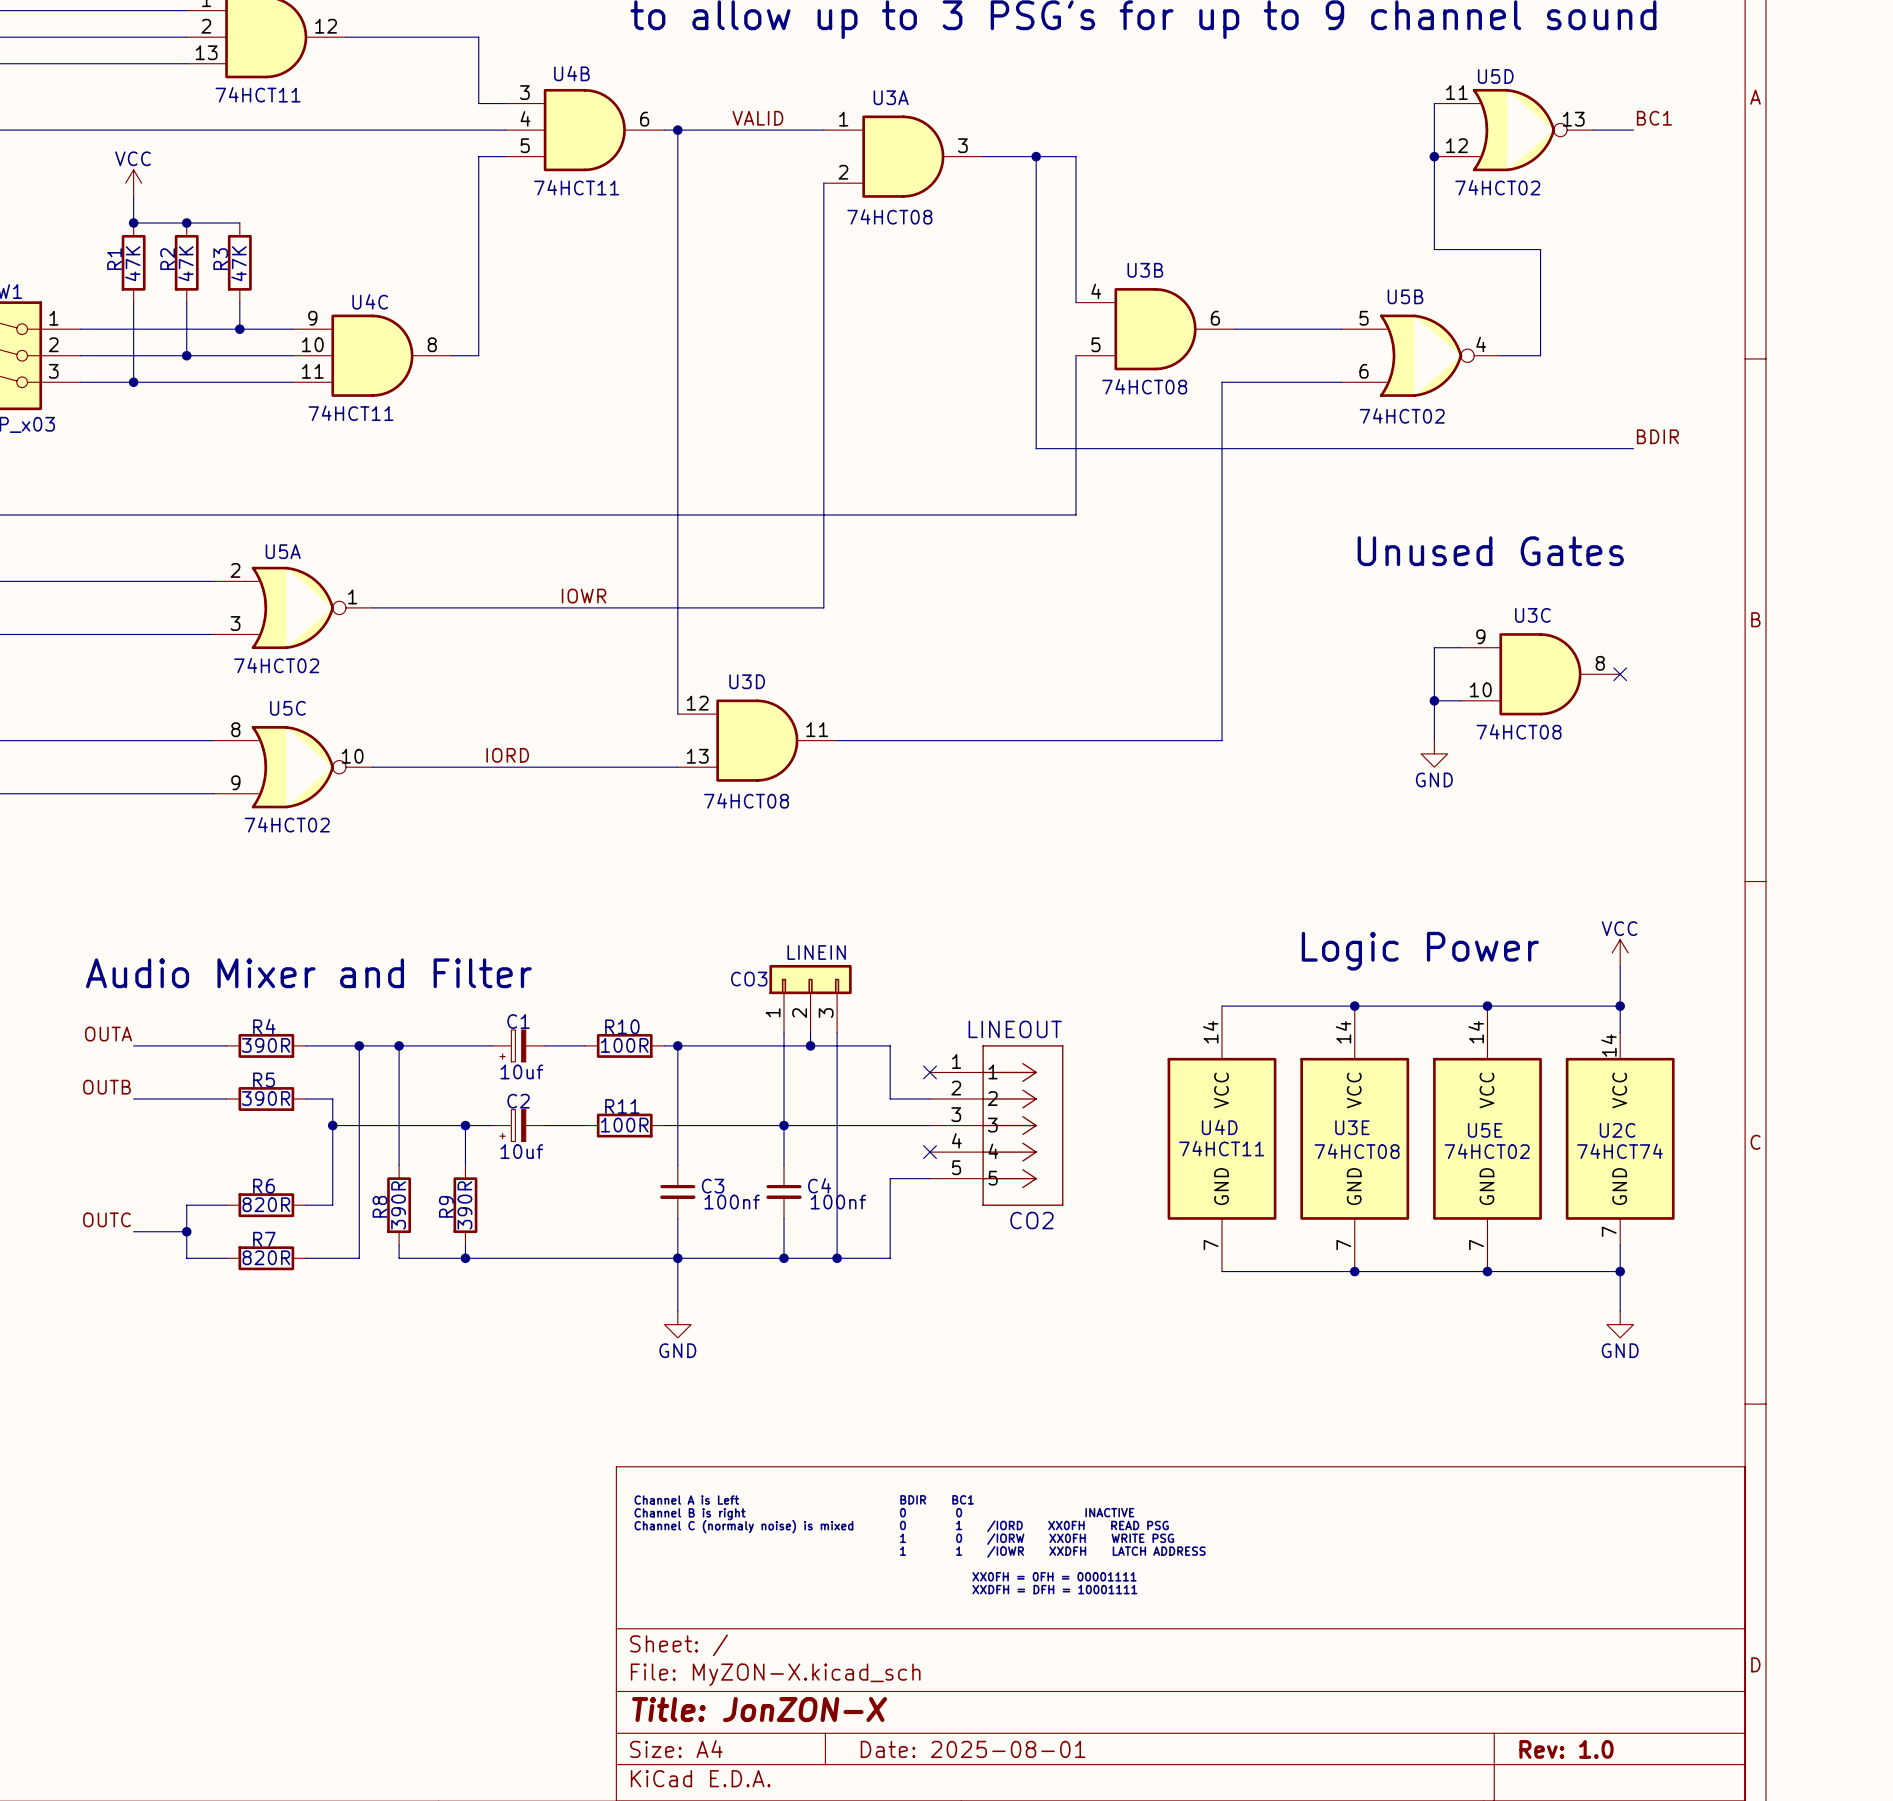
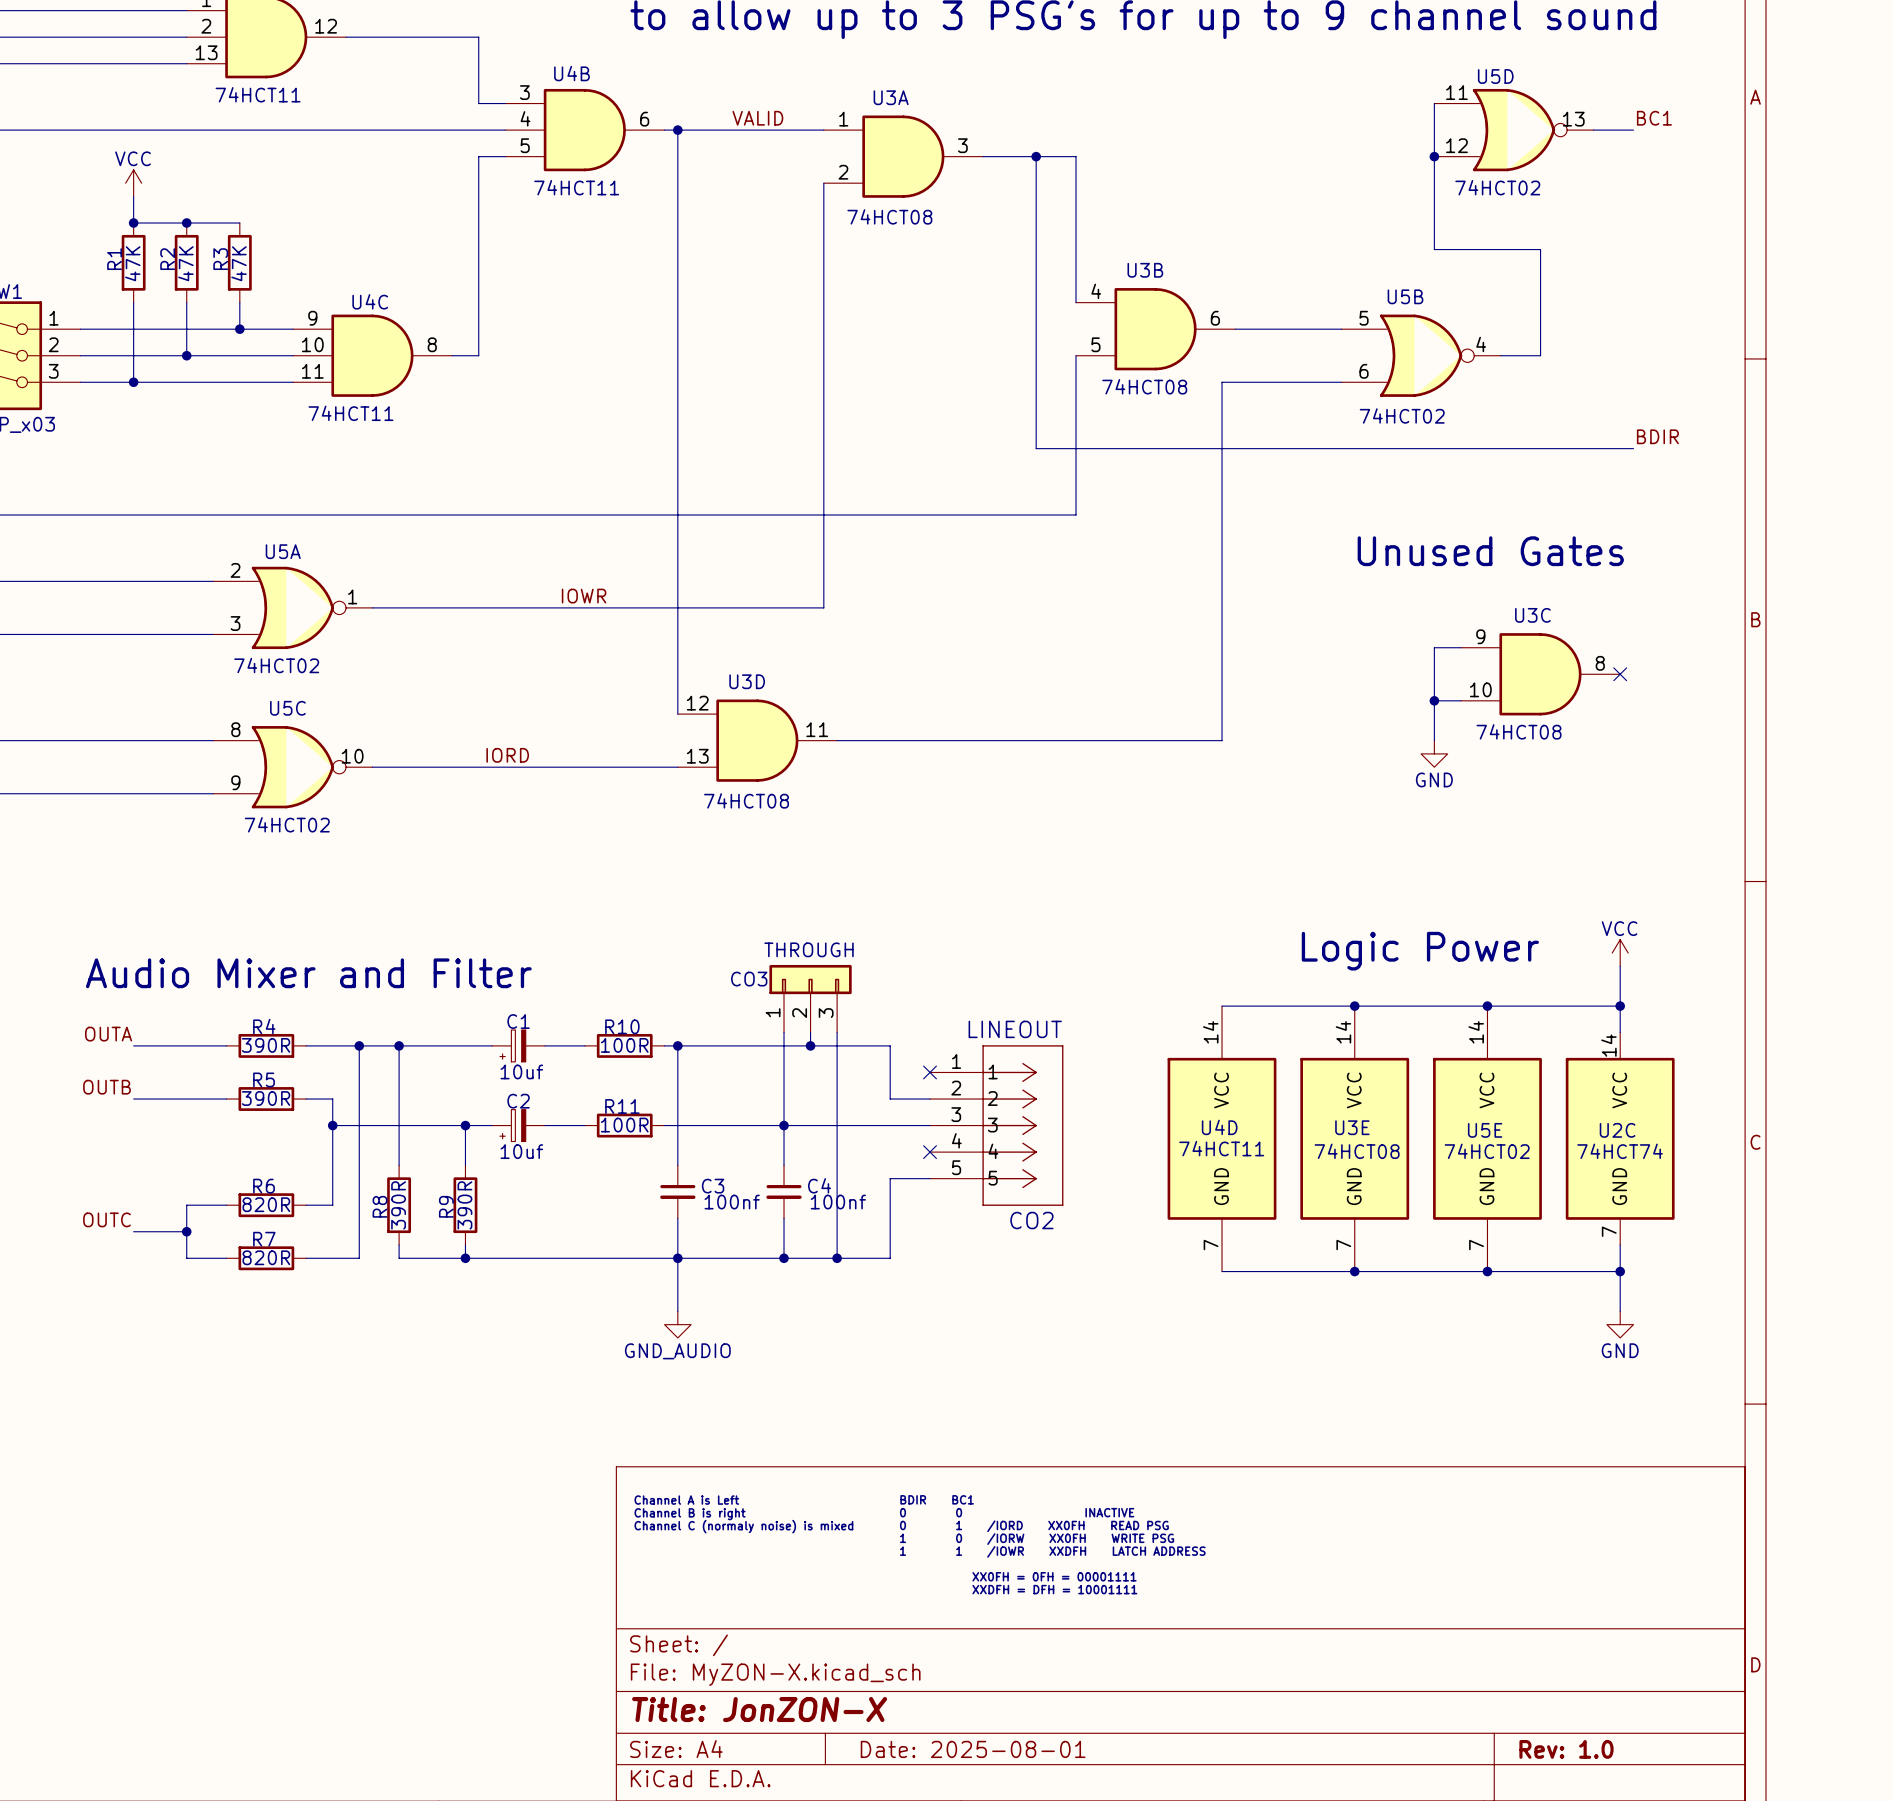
CO3 value: LINEIN (816, 952) -> THROUGH (809, 949)
power symbol: GND (677, 1324) -> GND_AUDIO (677, 1324)

